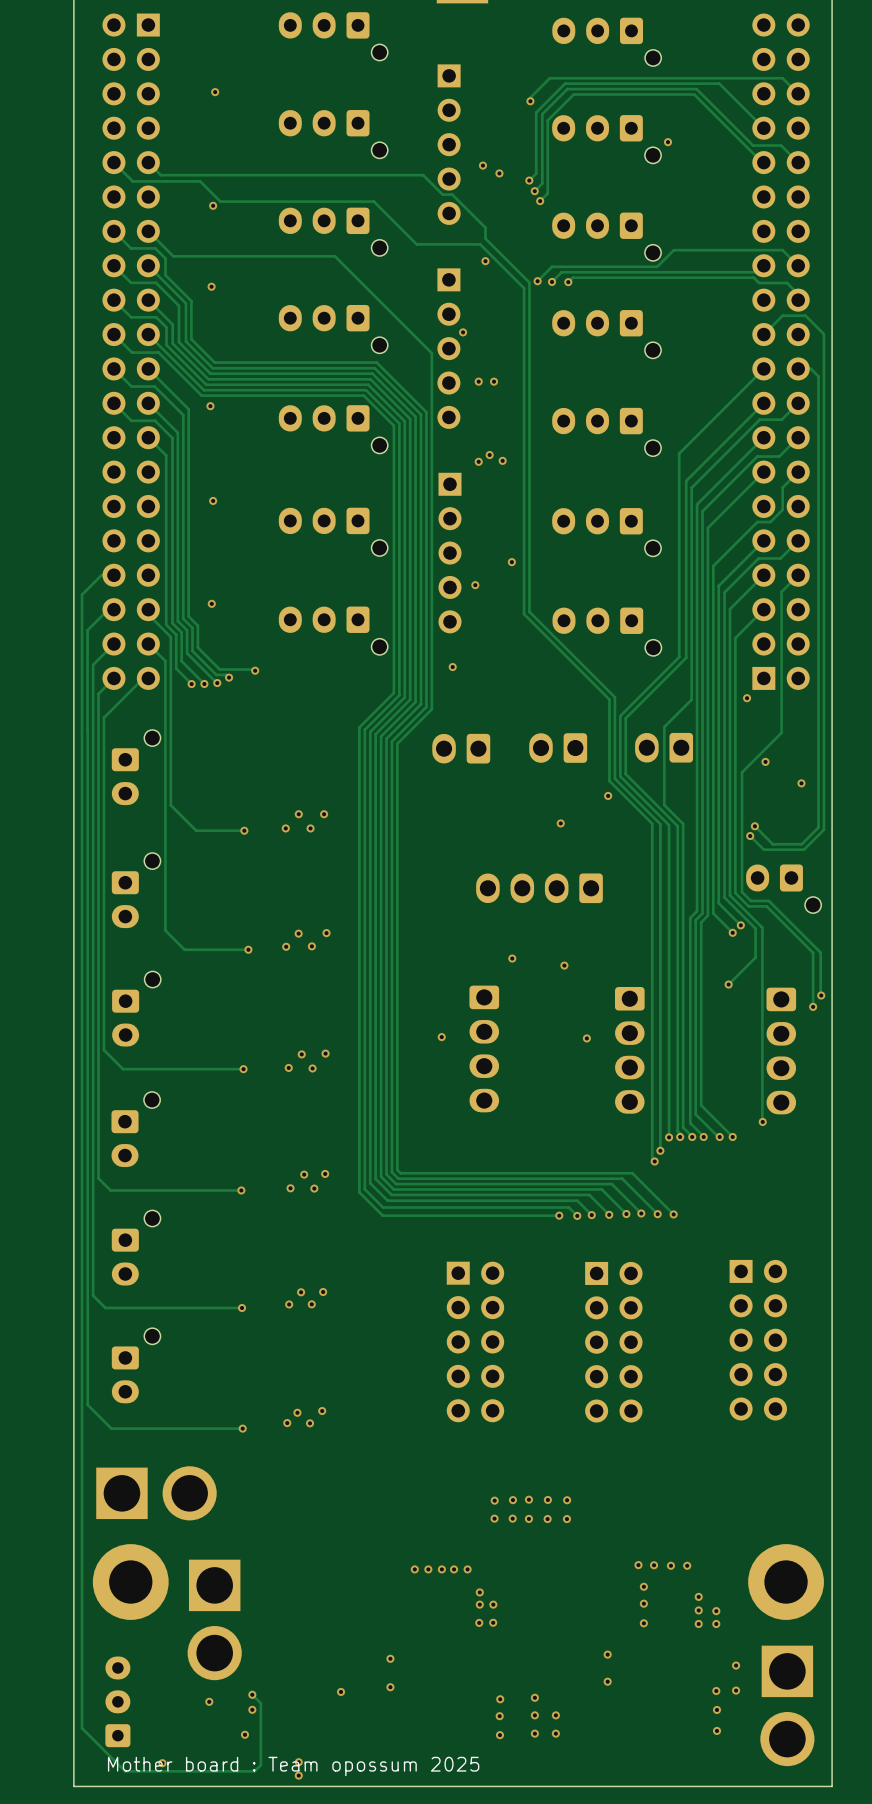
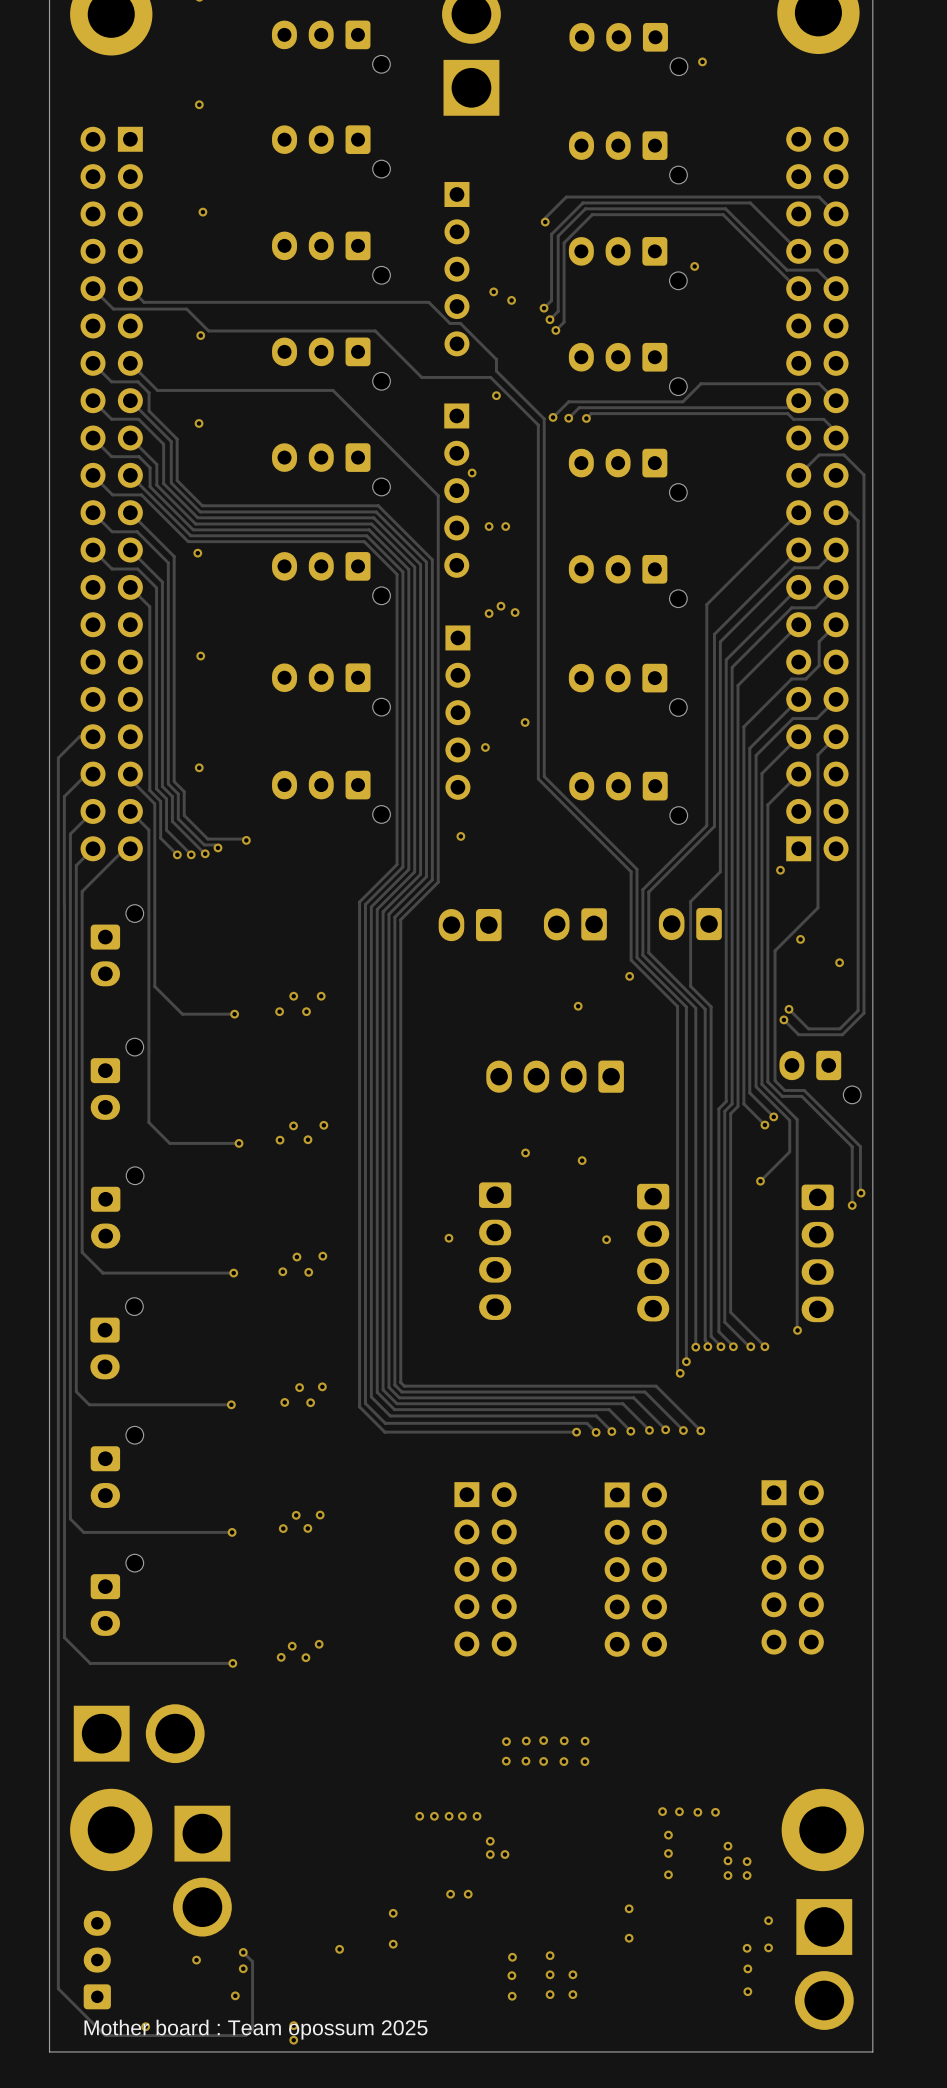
via: (479, 1622) -> none
via: (493, 1622) -> none
via: none -> (450, 1894)
via: none -> (468, 1894)

